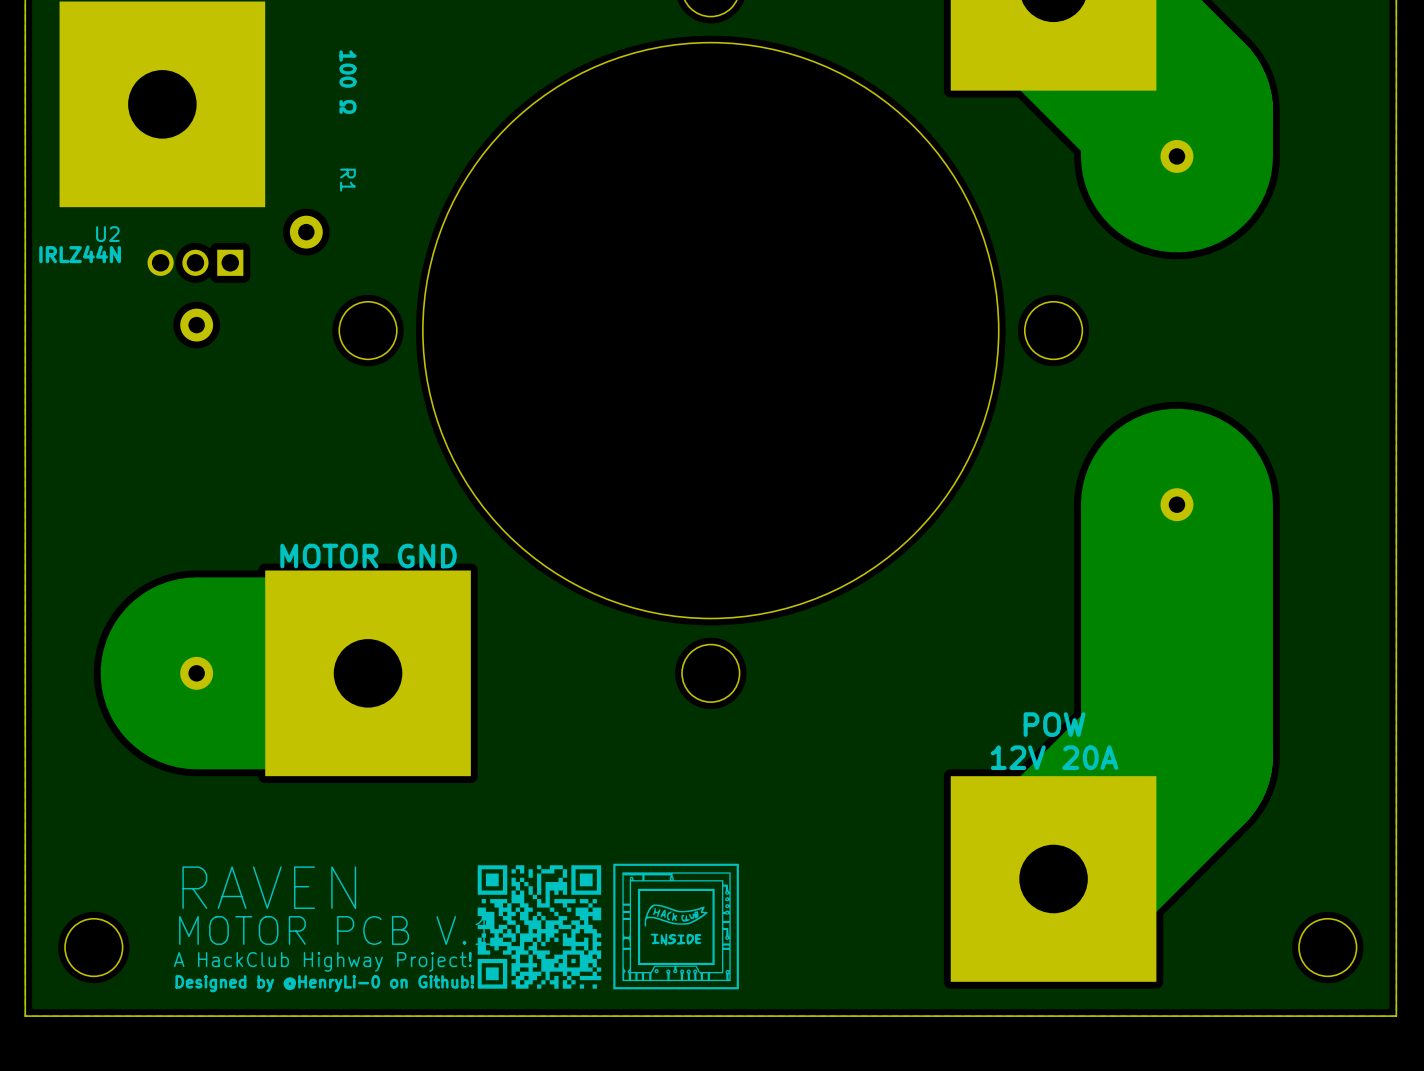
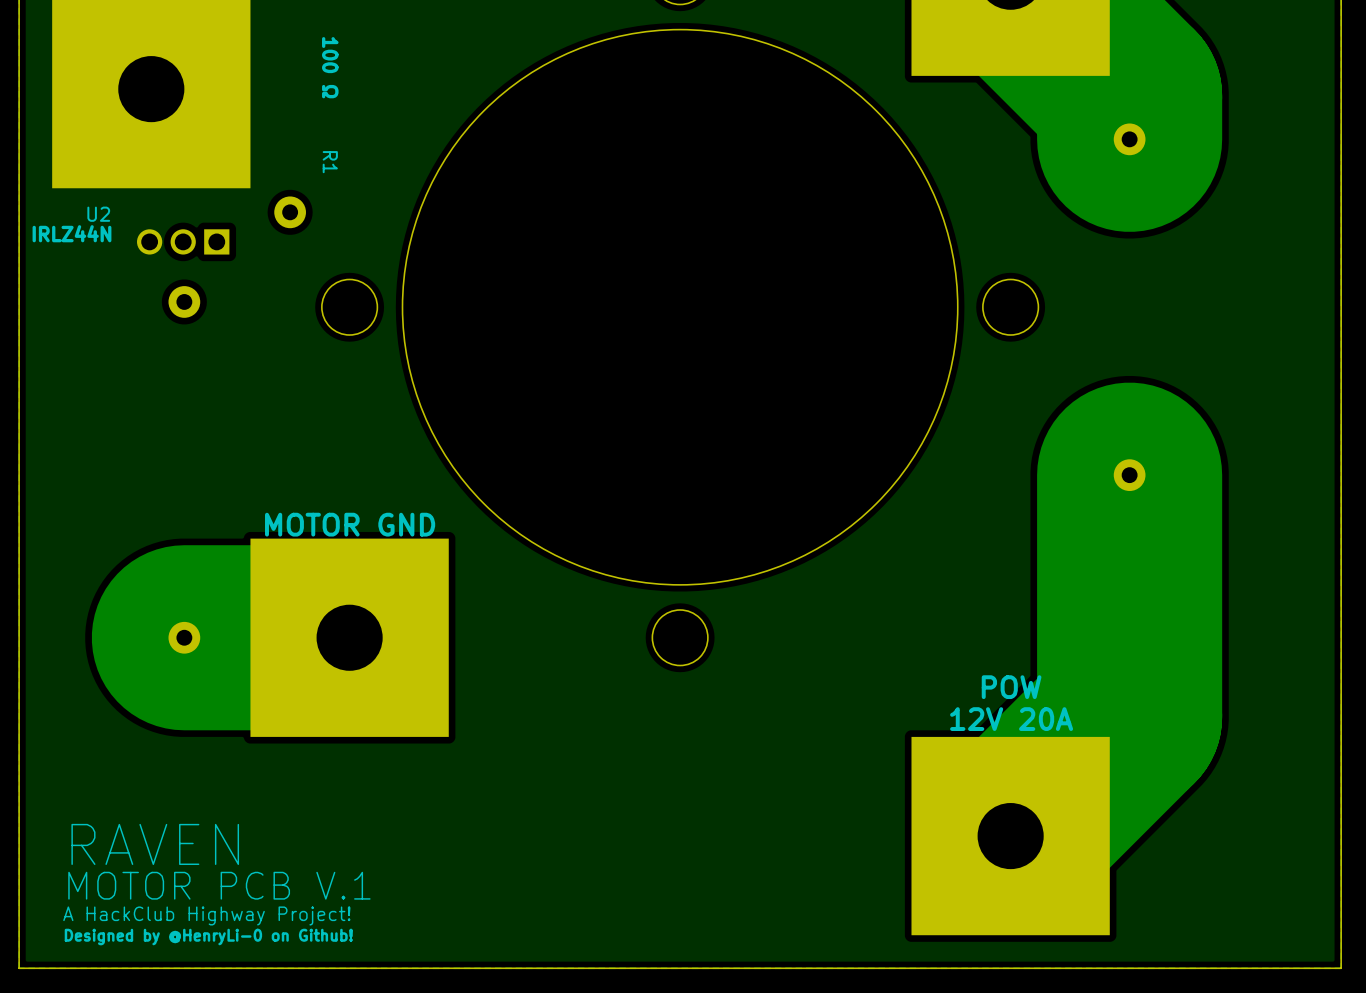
drawing: [477, 863, 739, 990] -> none
text position: RAVEN (269, 887) -> RAVEN (155, 844)
round board edge: [64, 918, 124, 978] -> none
round board edge: [1298, 918, 1358, 978] -> none
text position: MOTOR PCB V.1 (335, 930) -> MOTOR PCB V.1 (219, 885)
text position: A HackClub Highway Project! (322, 961) -> A HackClub Highway Project! (206, 915)
text position: Designed by @HenryLi-0 on Github! (324, 983) -> Designed by @HenryLi-0 on Github! (208, 937)

